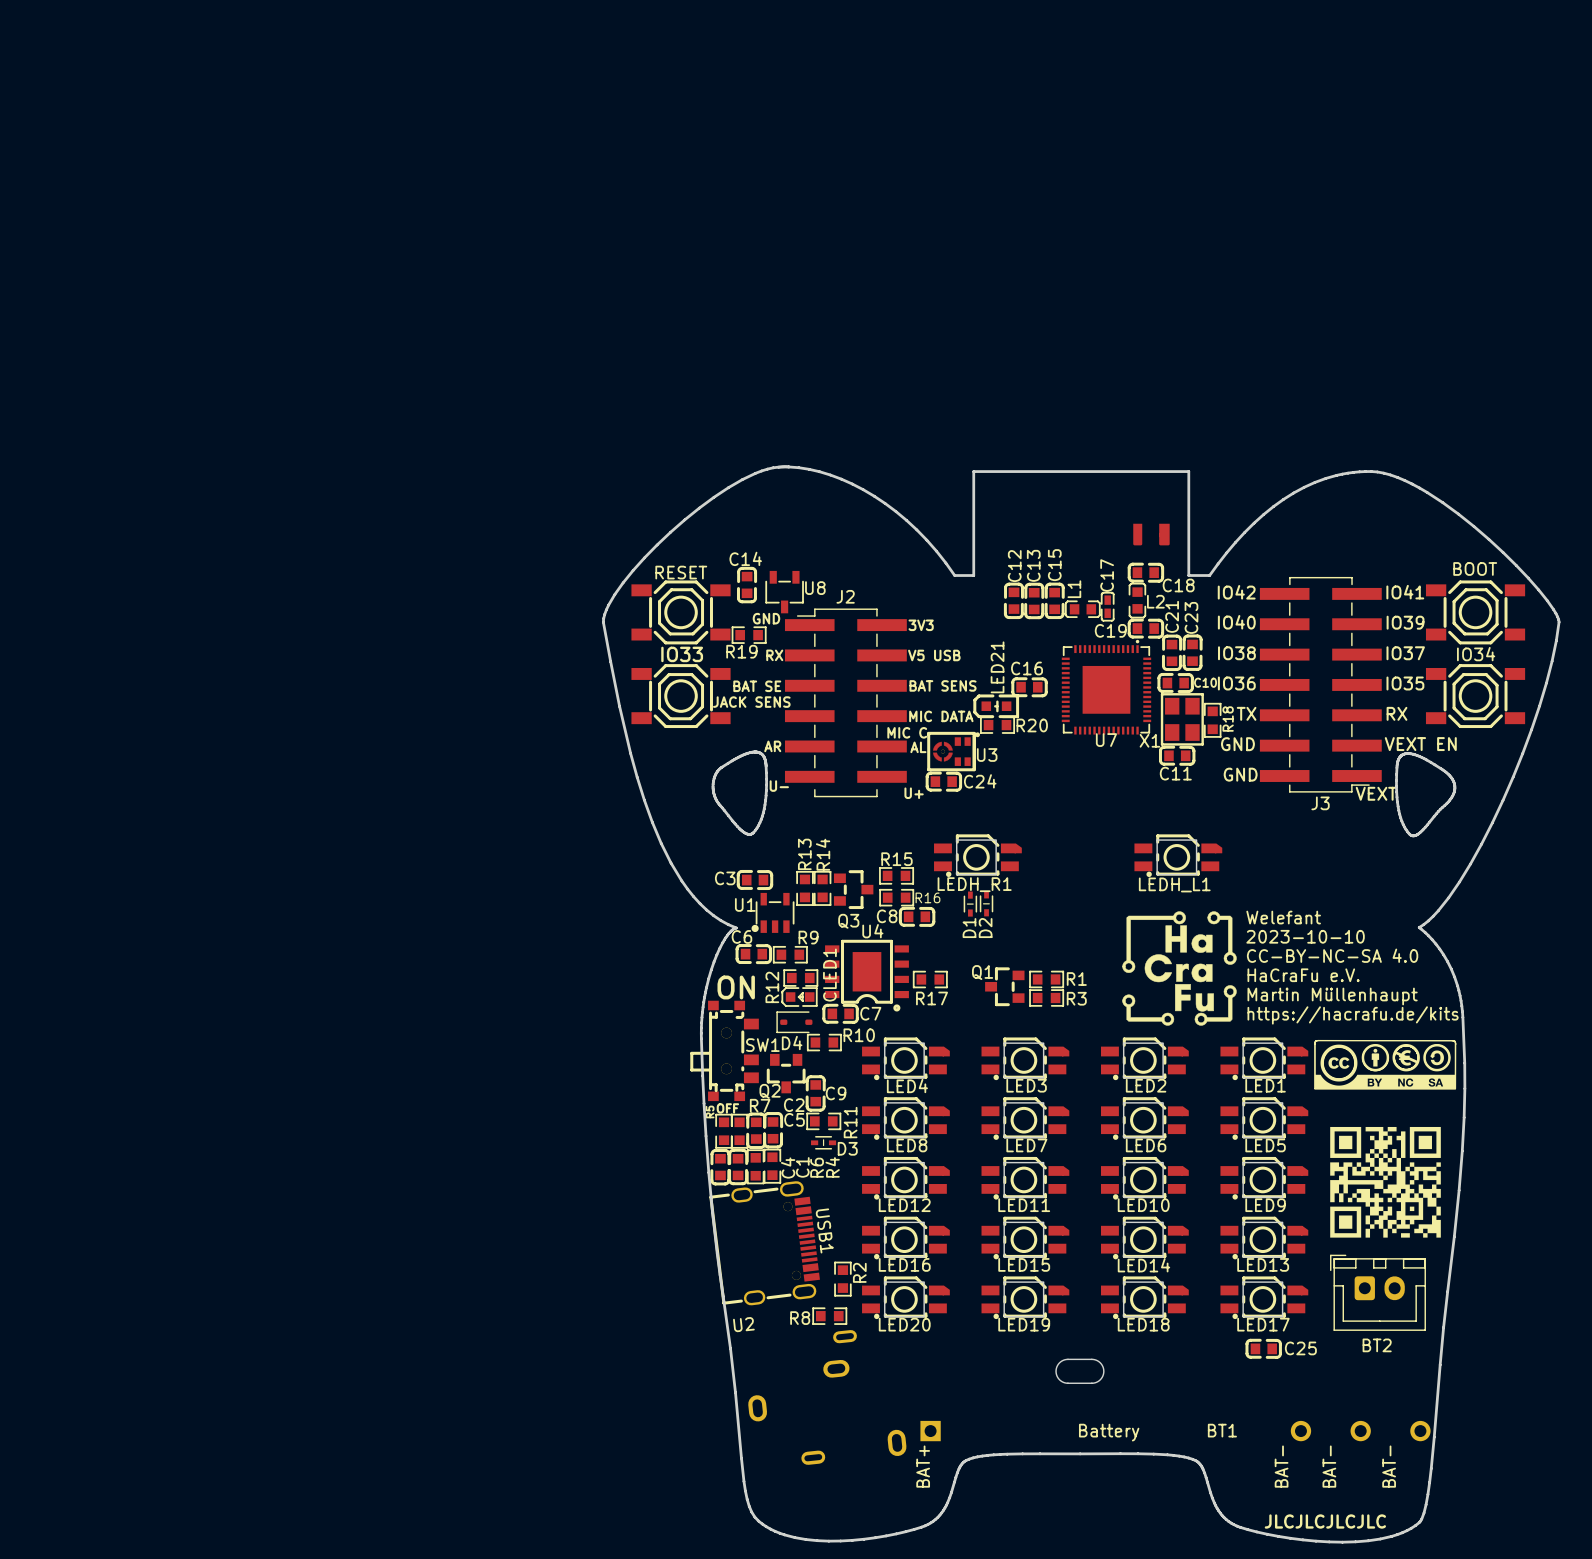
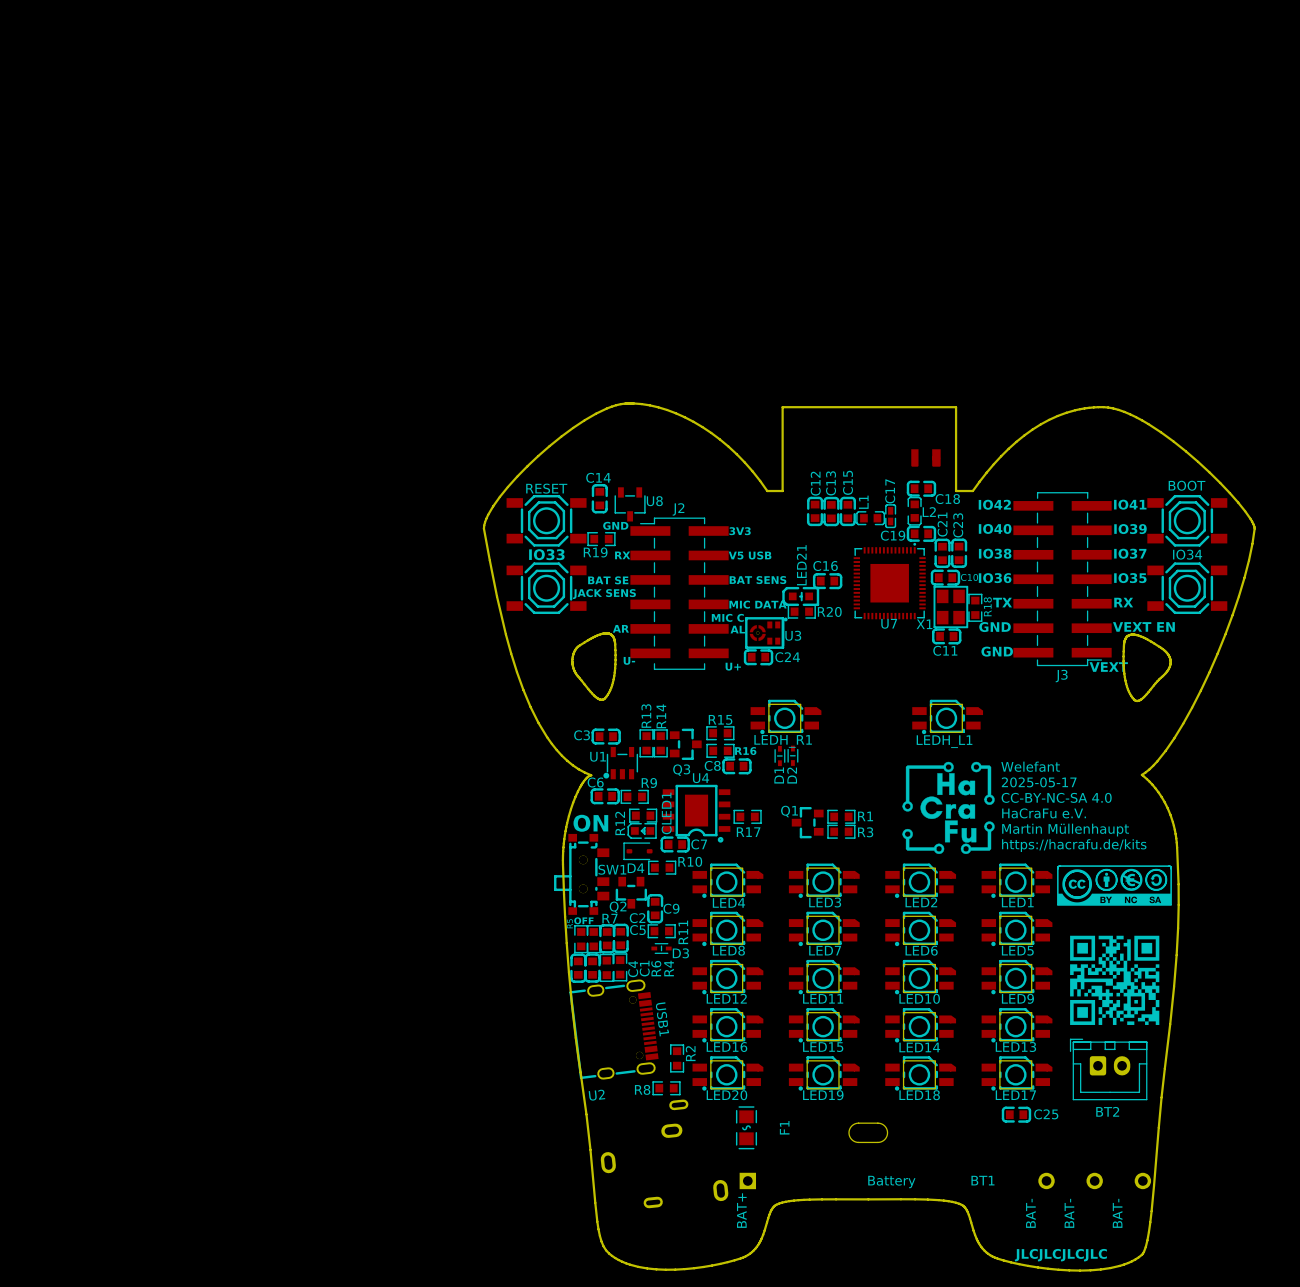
text: 2023-10-10 (1305, 936) -> 2025-05-17 (1039, 782)
F1: none -> (746, 1127)

